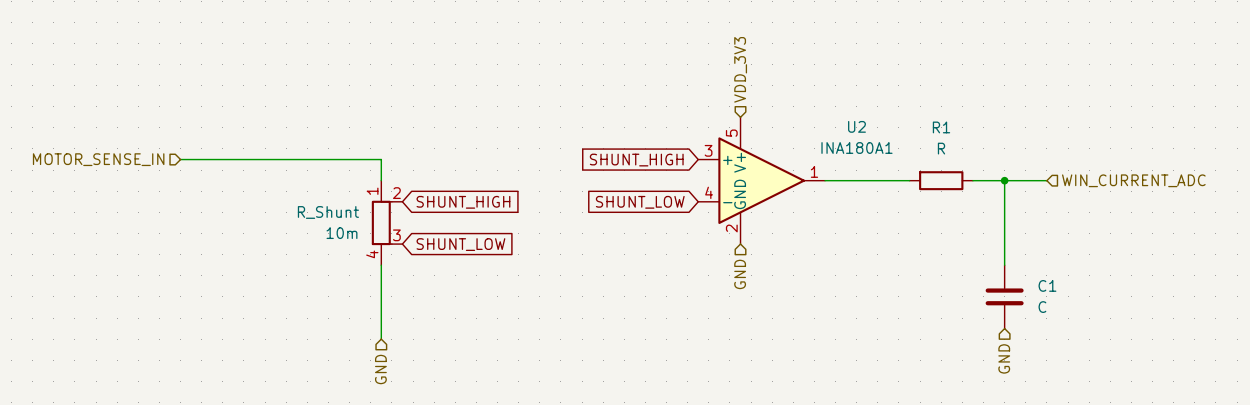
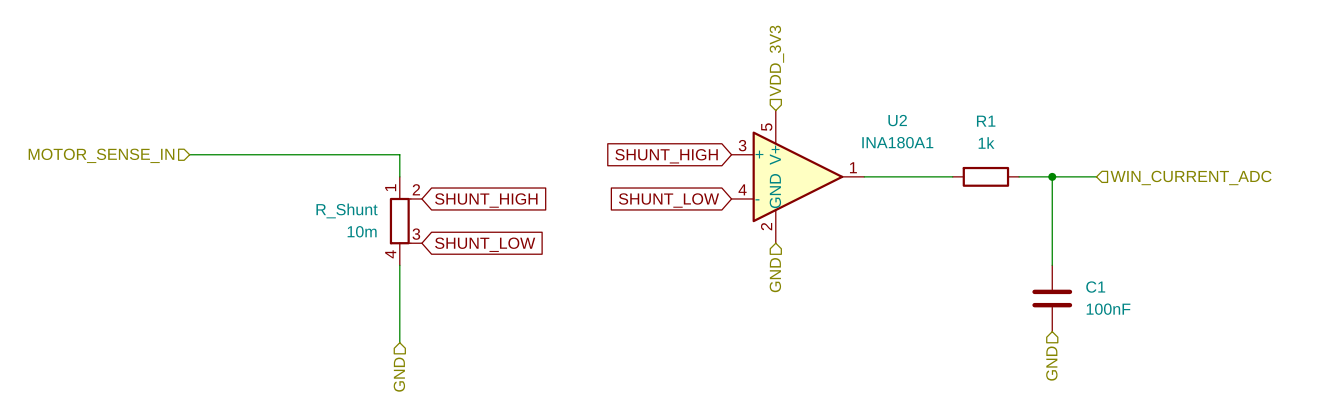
R1 value: R (941, 148) -> 1k (986, 142)
C1 value: C (1042, 307) -> 100nF (1108, 309)

